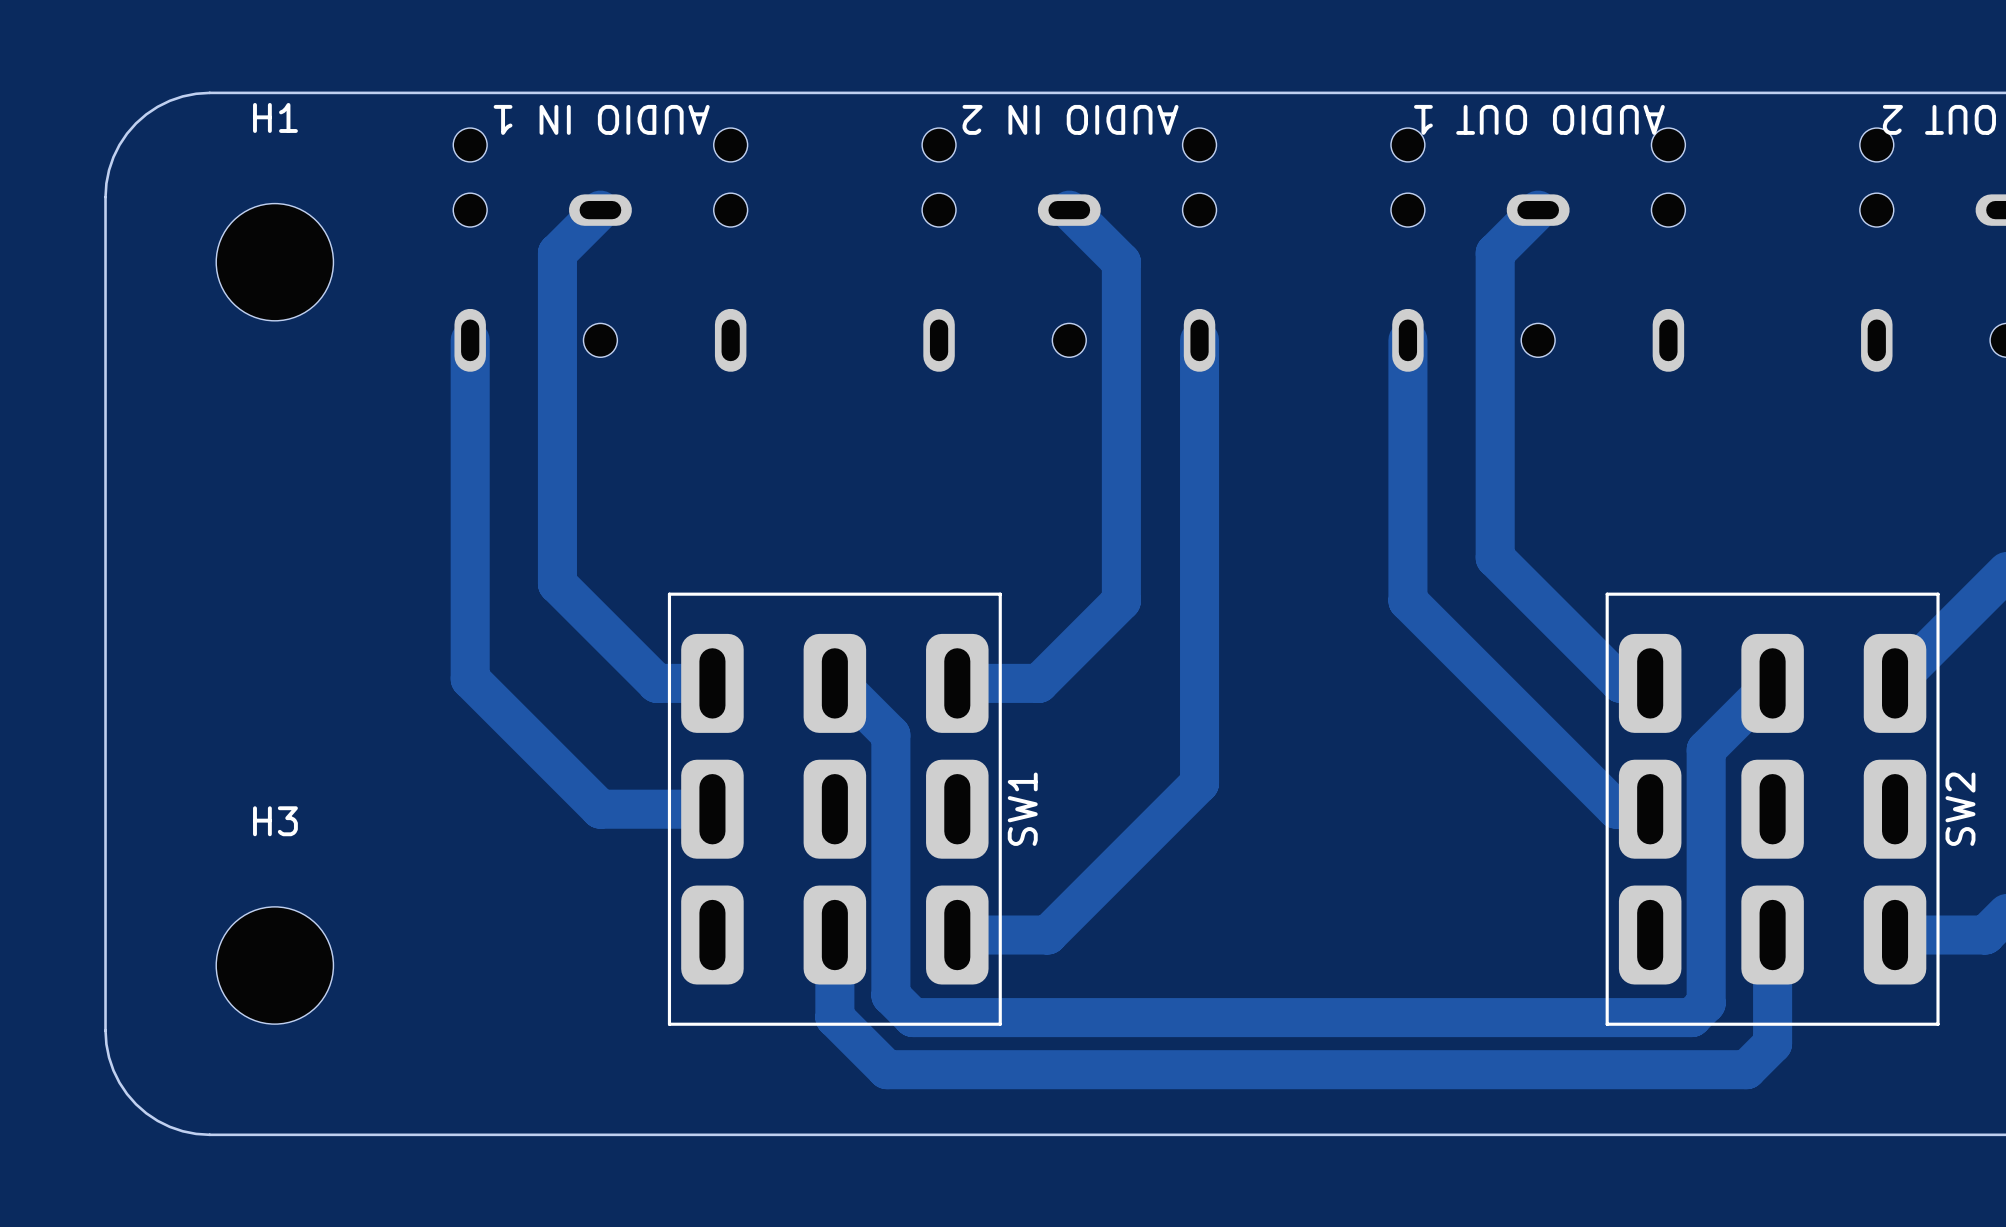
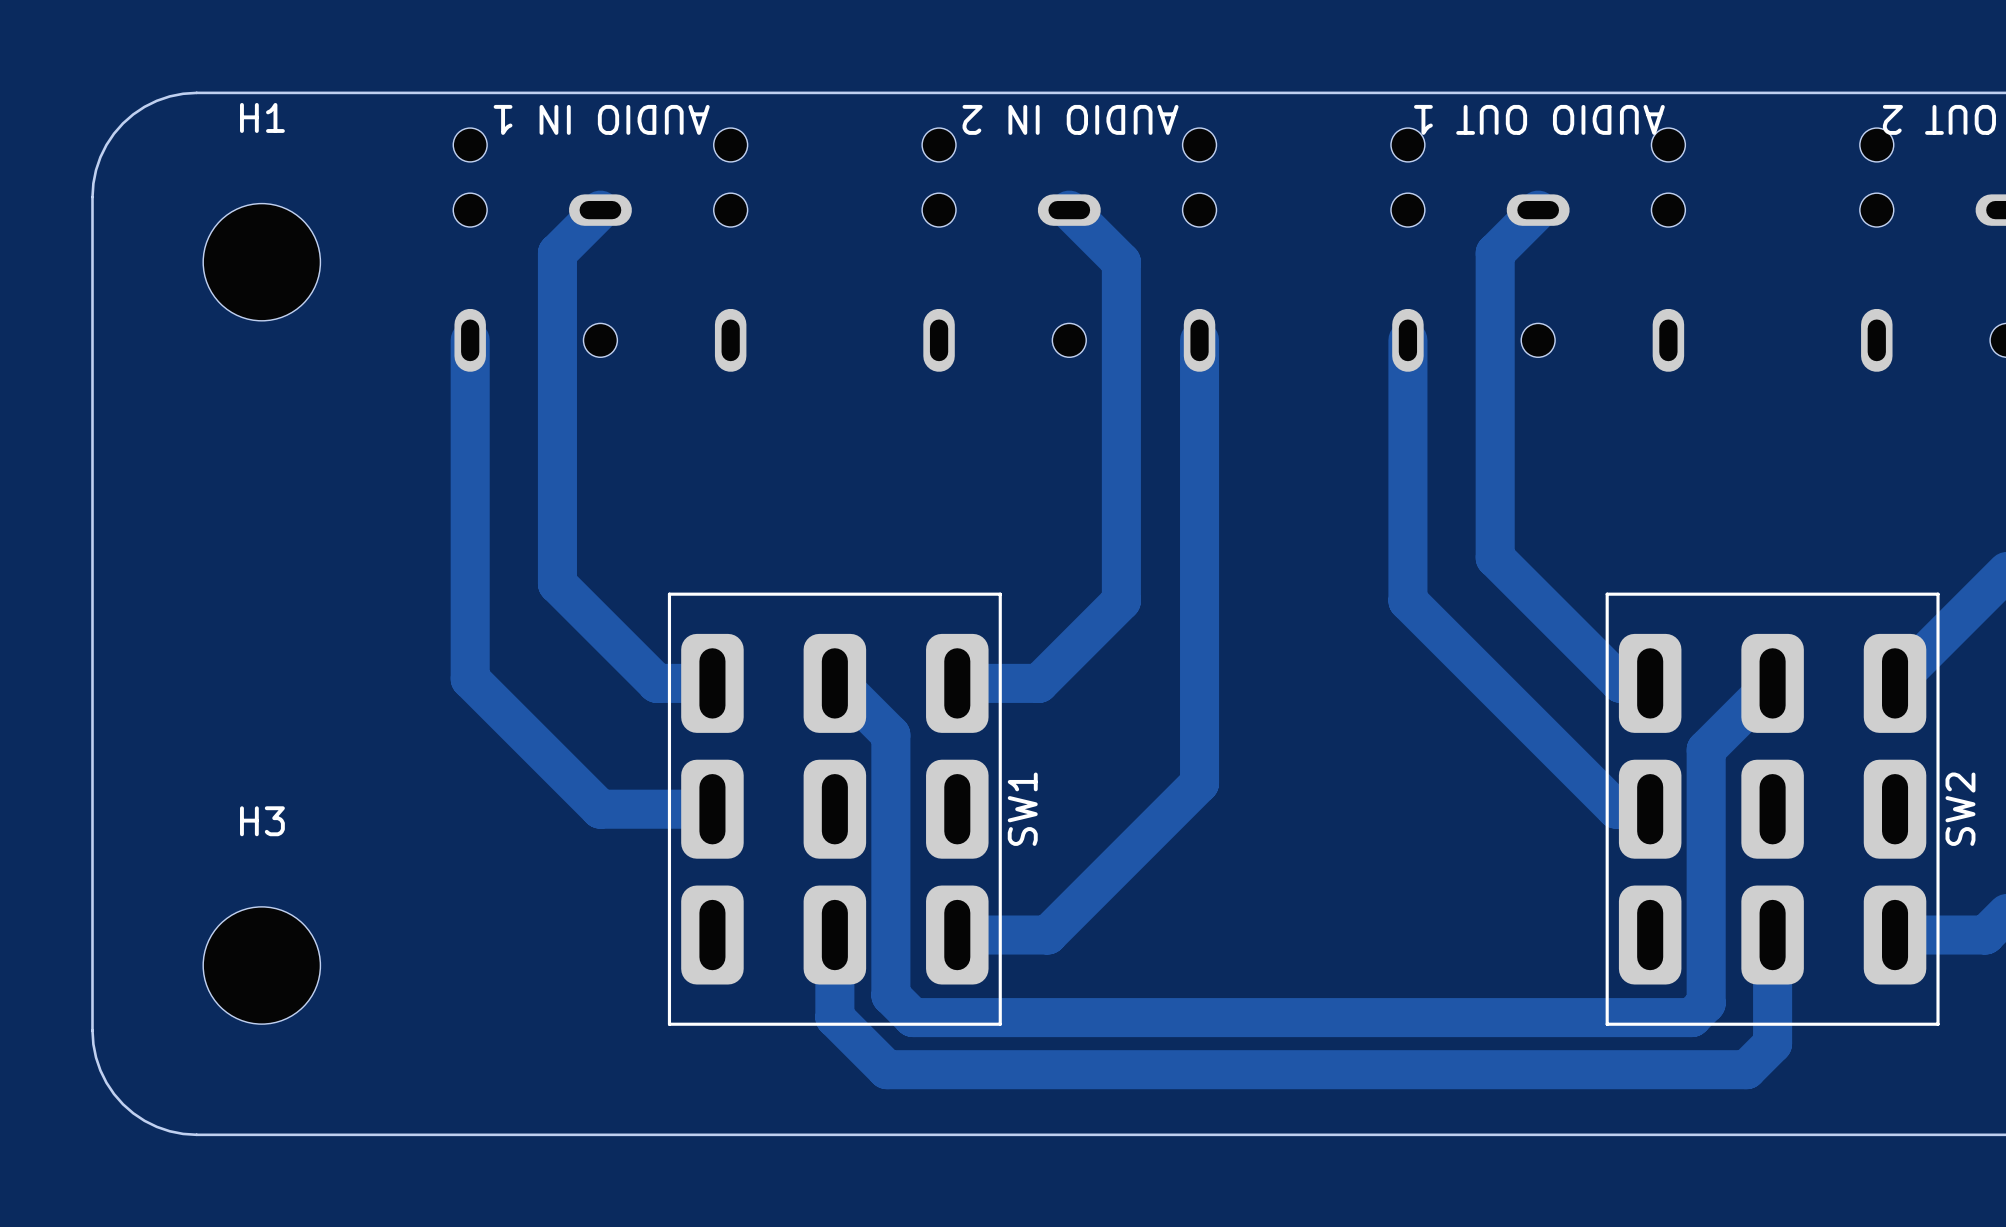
board edge: (209, 92) (196, 93) (169, 100) (157, 106) (136, 123) (119, 144) (113, 157) (106, 183) (105, 197) (106, 1044) (109, 1057) (119, 1082) (136, 1104) (157, 1120) (169, 1126) (196, 1133) (209, 1134) -> (209, 92) (183, 93) (156, 100) (144, 106) (123, 123) (114, 133) (100, 157) (93, 183) (92, 197) (93, 1044) (100, 1070) (106, 1082) (114, 1094) (133, 1113) (156, 1126) (169, 1131) (209, 1134)
H1 position: (274, 262) -> (261, 262)
H3 position: (274, 965) -> (261, 965)

